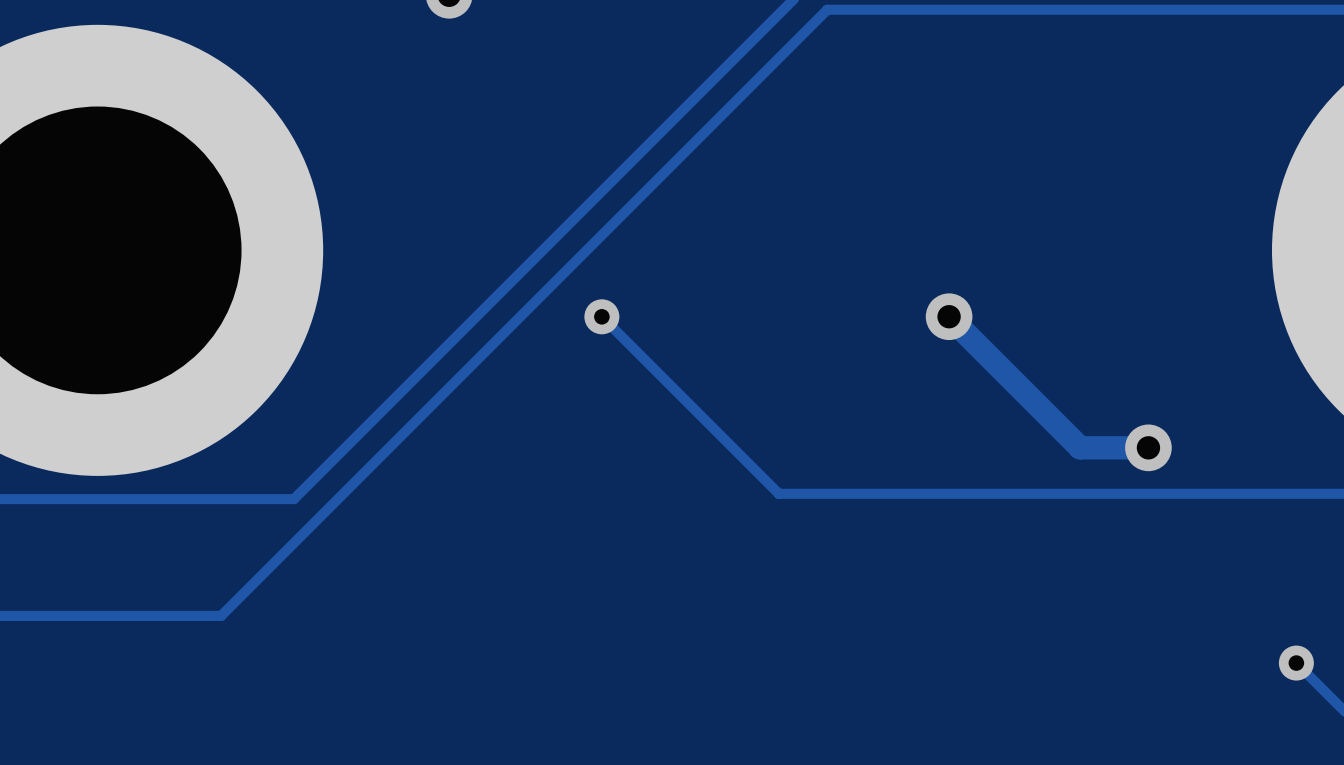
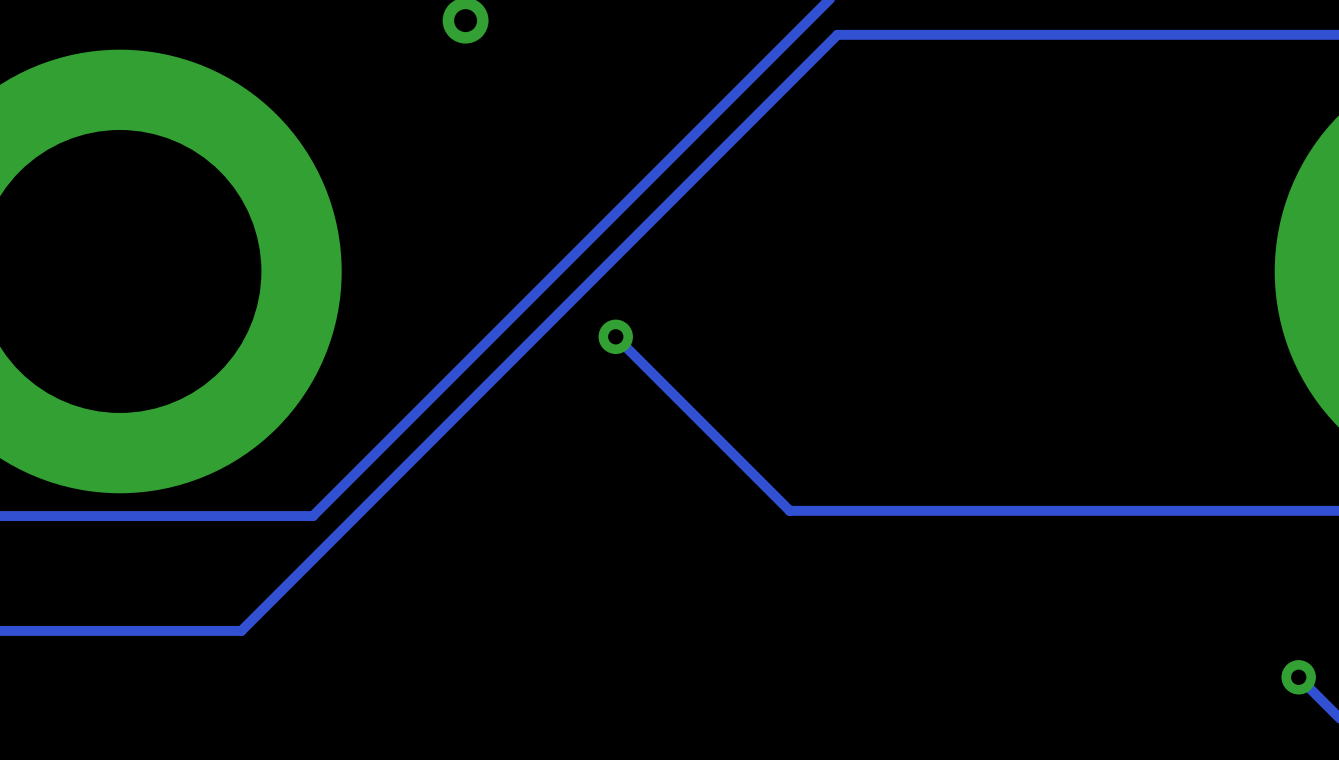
track: (949, 316) (1080, 447) (1148, 447) -> none
via: (949, 316) -> none
via: (1148, 447) -> none

